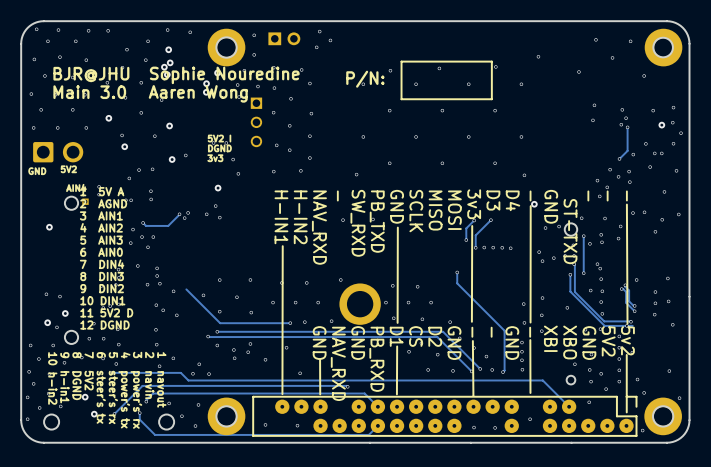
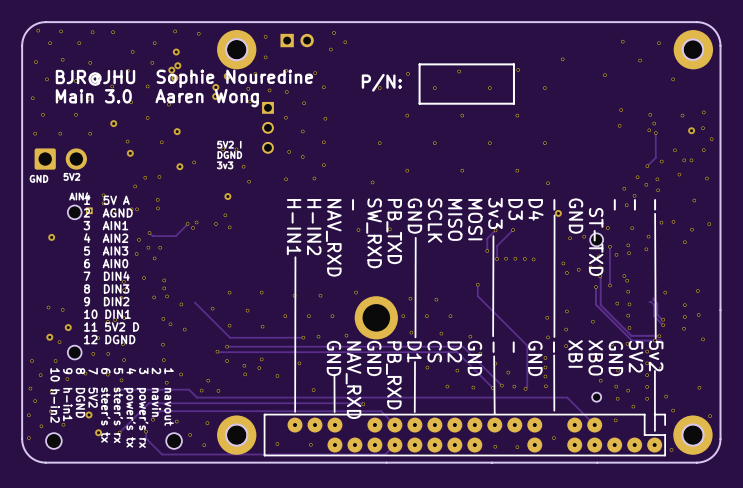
via: (625, 285) -> none
via: (621, 289) -> none

